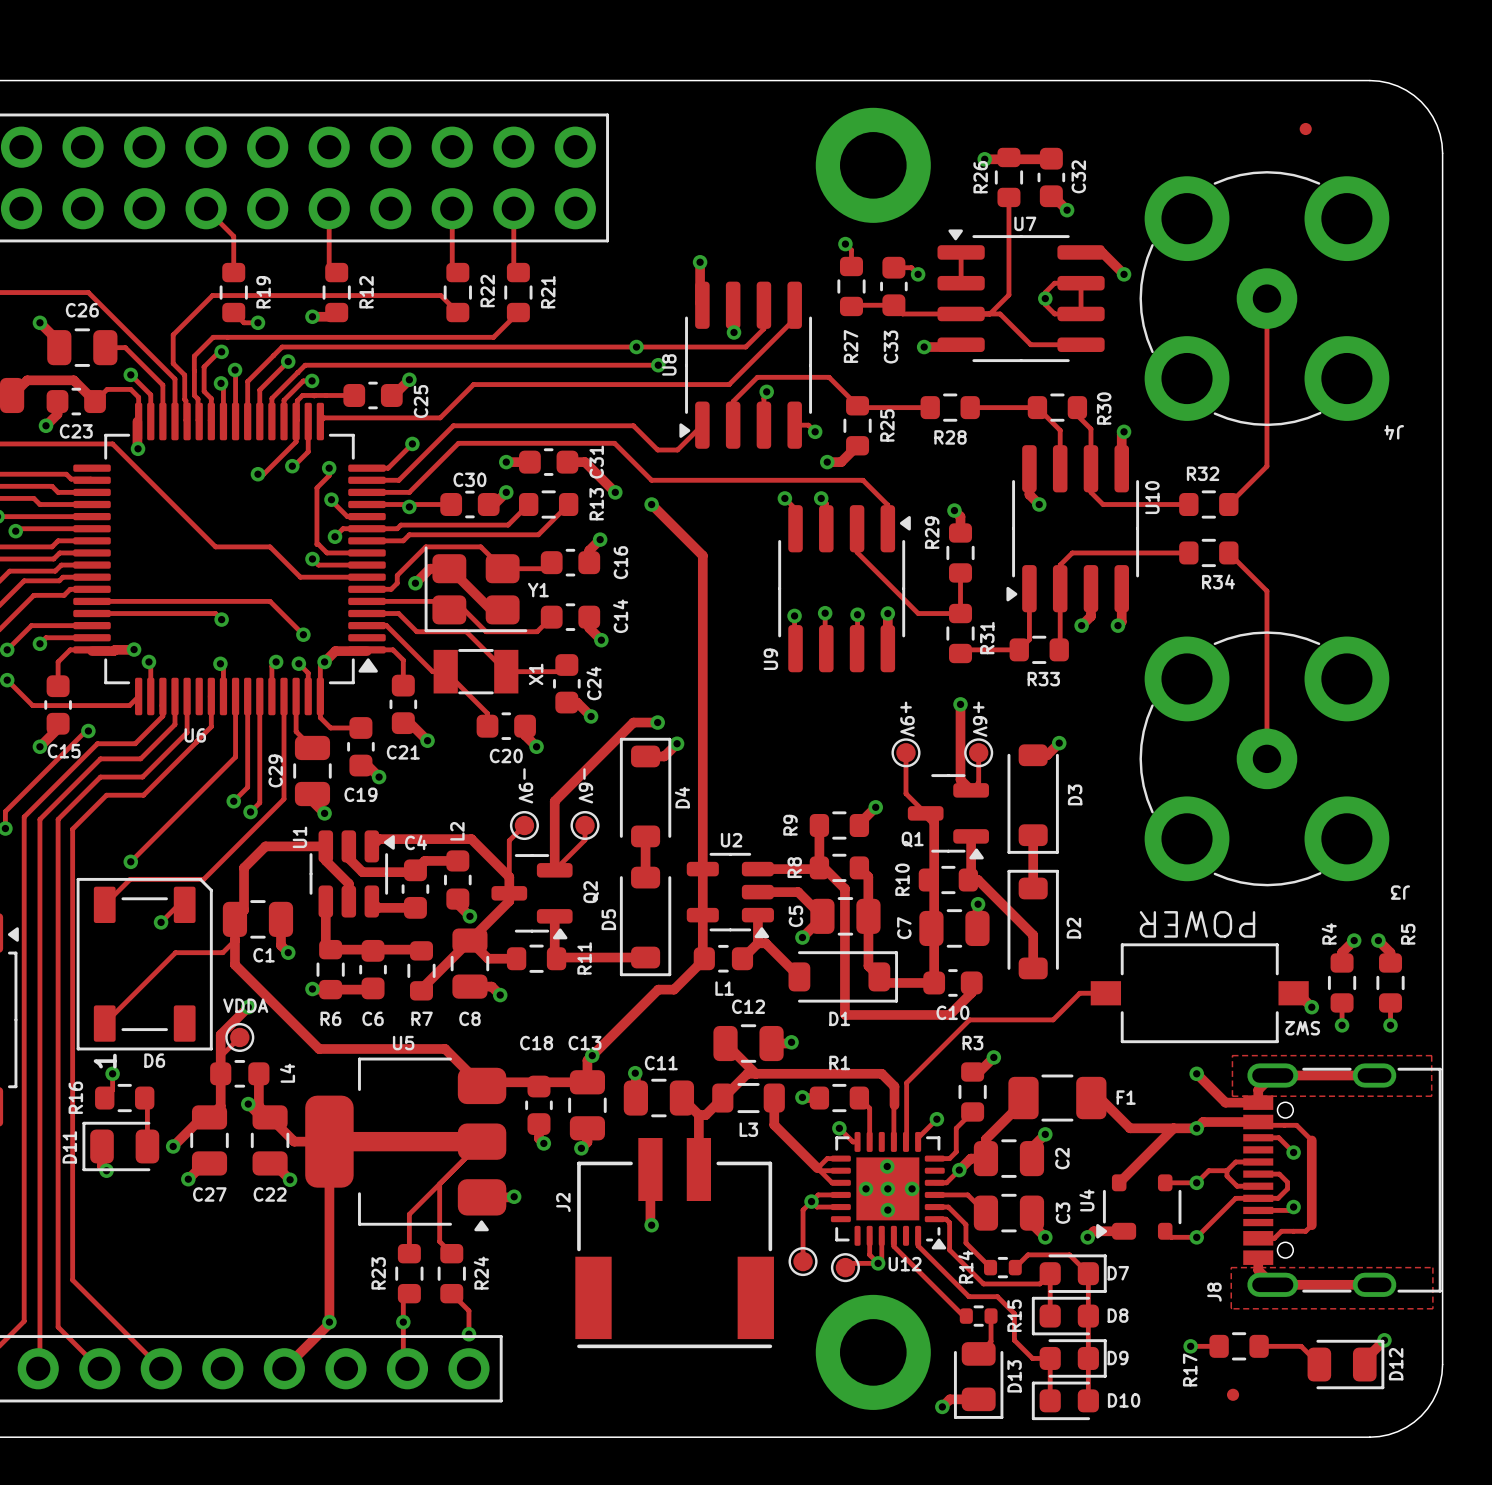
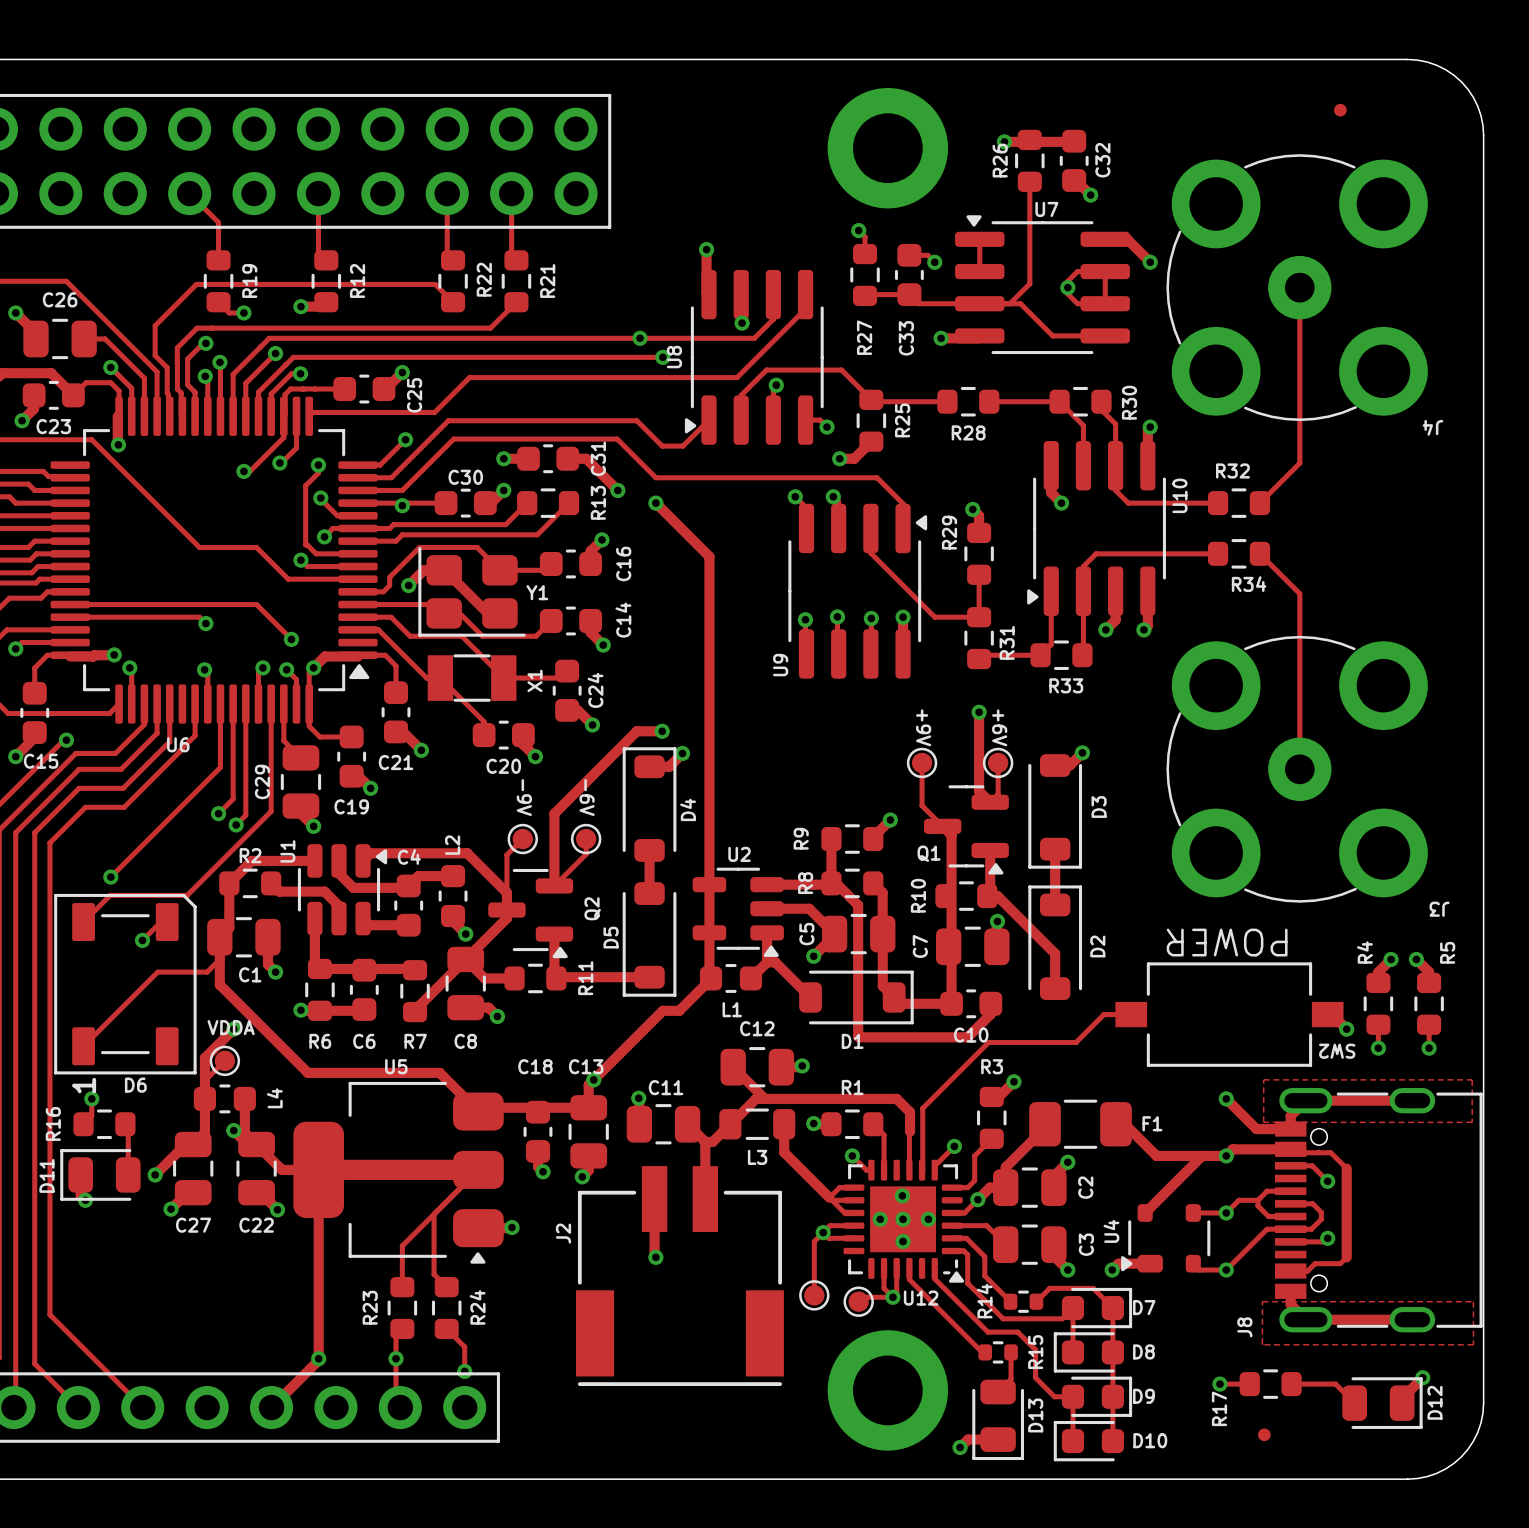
track: (325, 846) (325, 860) (348, 883) (348, 889) -> (271, 883) (279, 891) (324, 891) (338, 906)
R2: none -> (250, 883)

